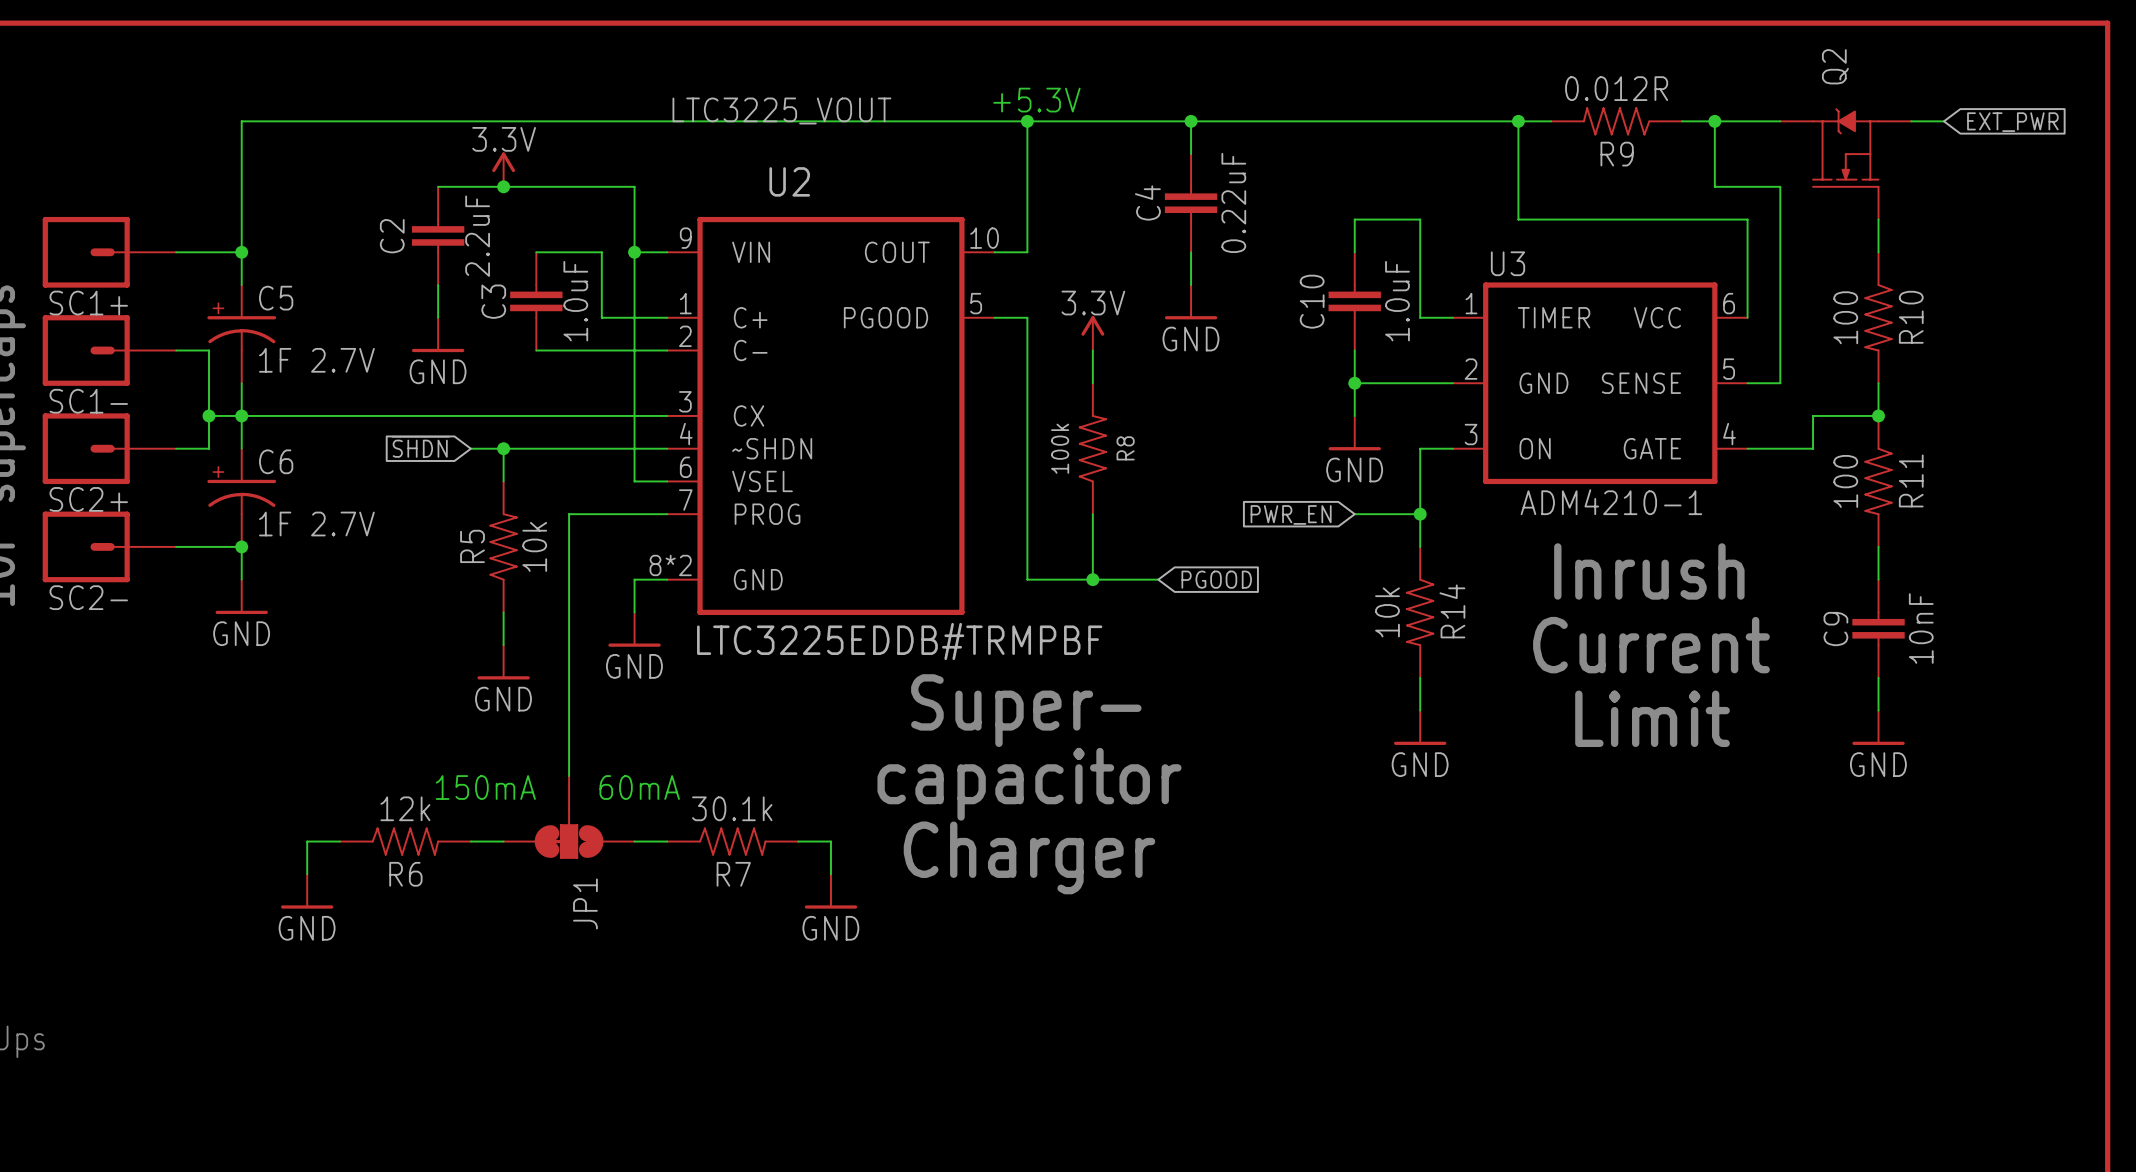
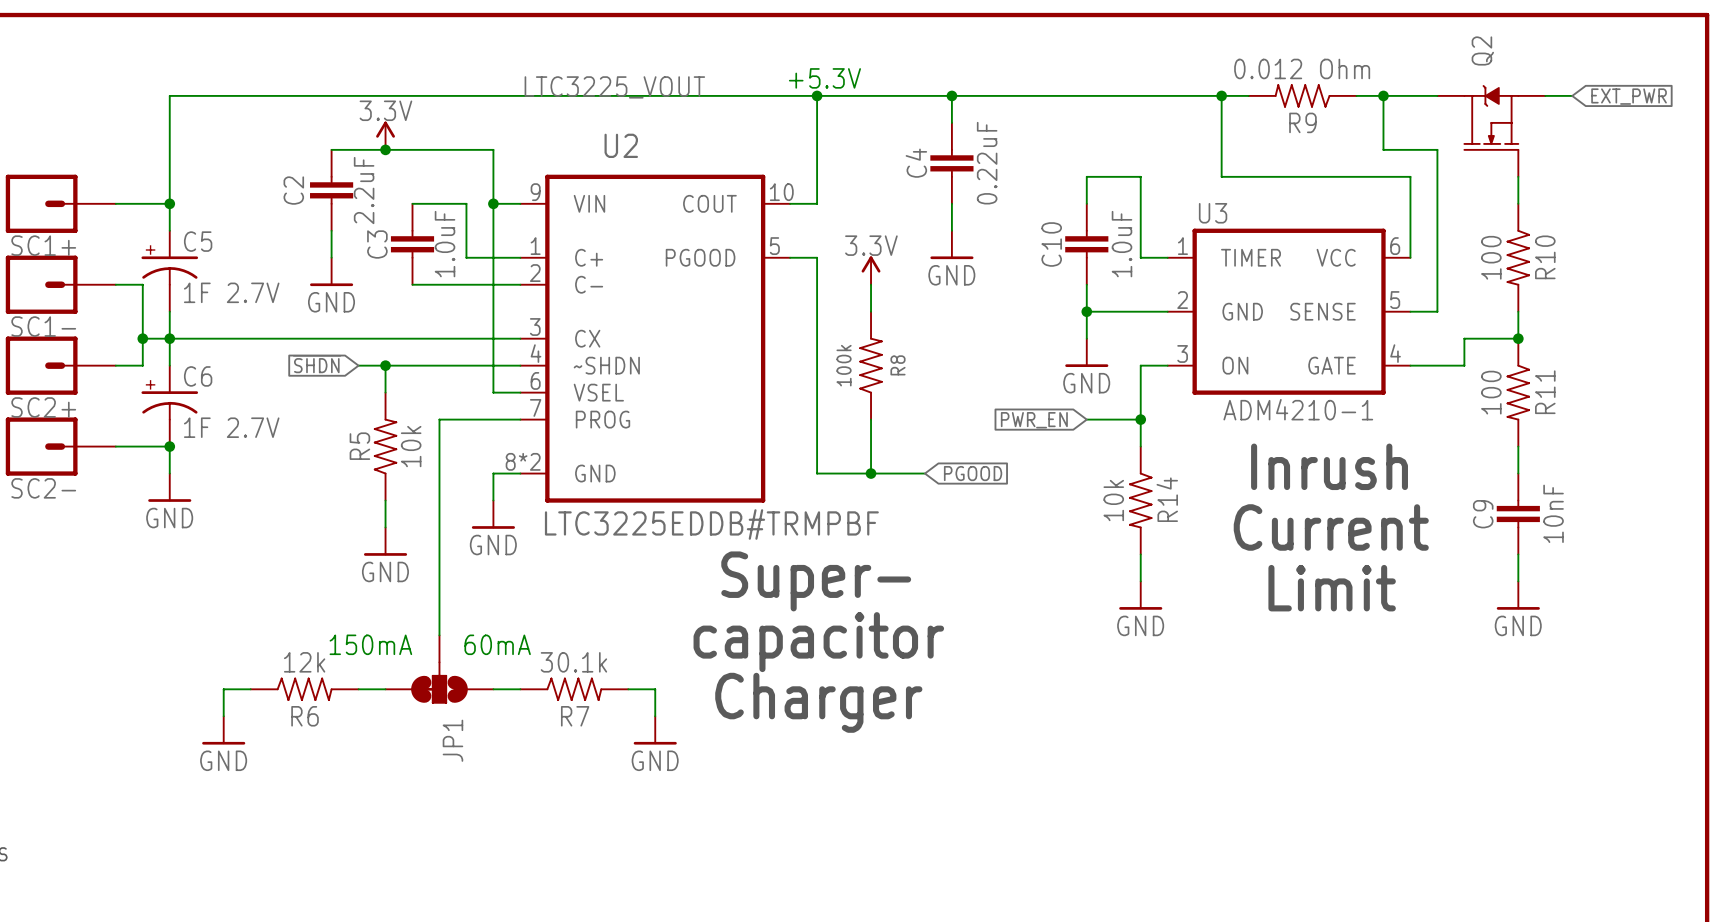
R9 value: 0.012R (1616, 88) -> 0.012 Ohm (1302, 68)

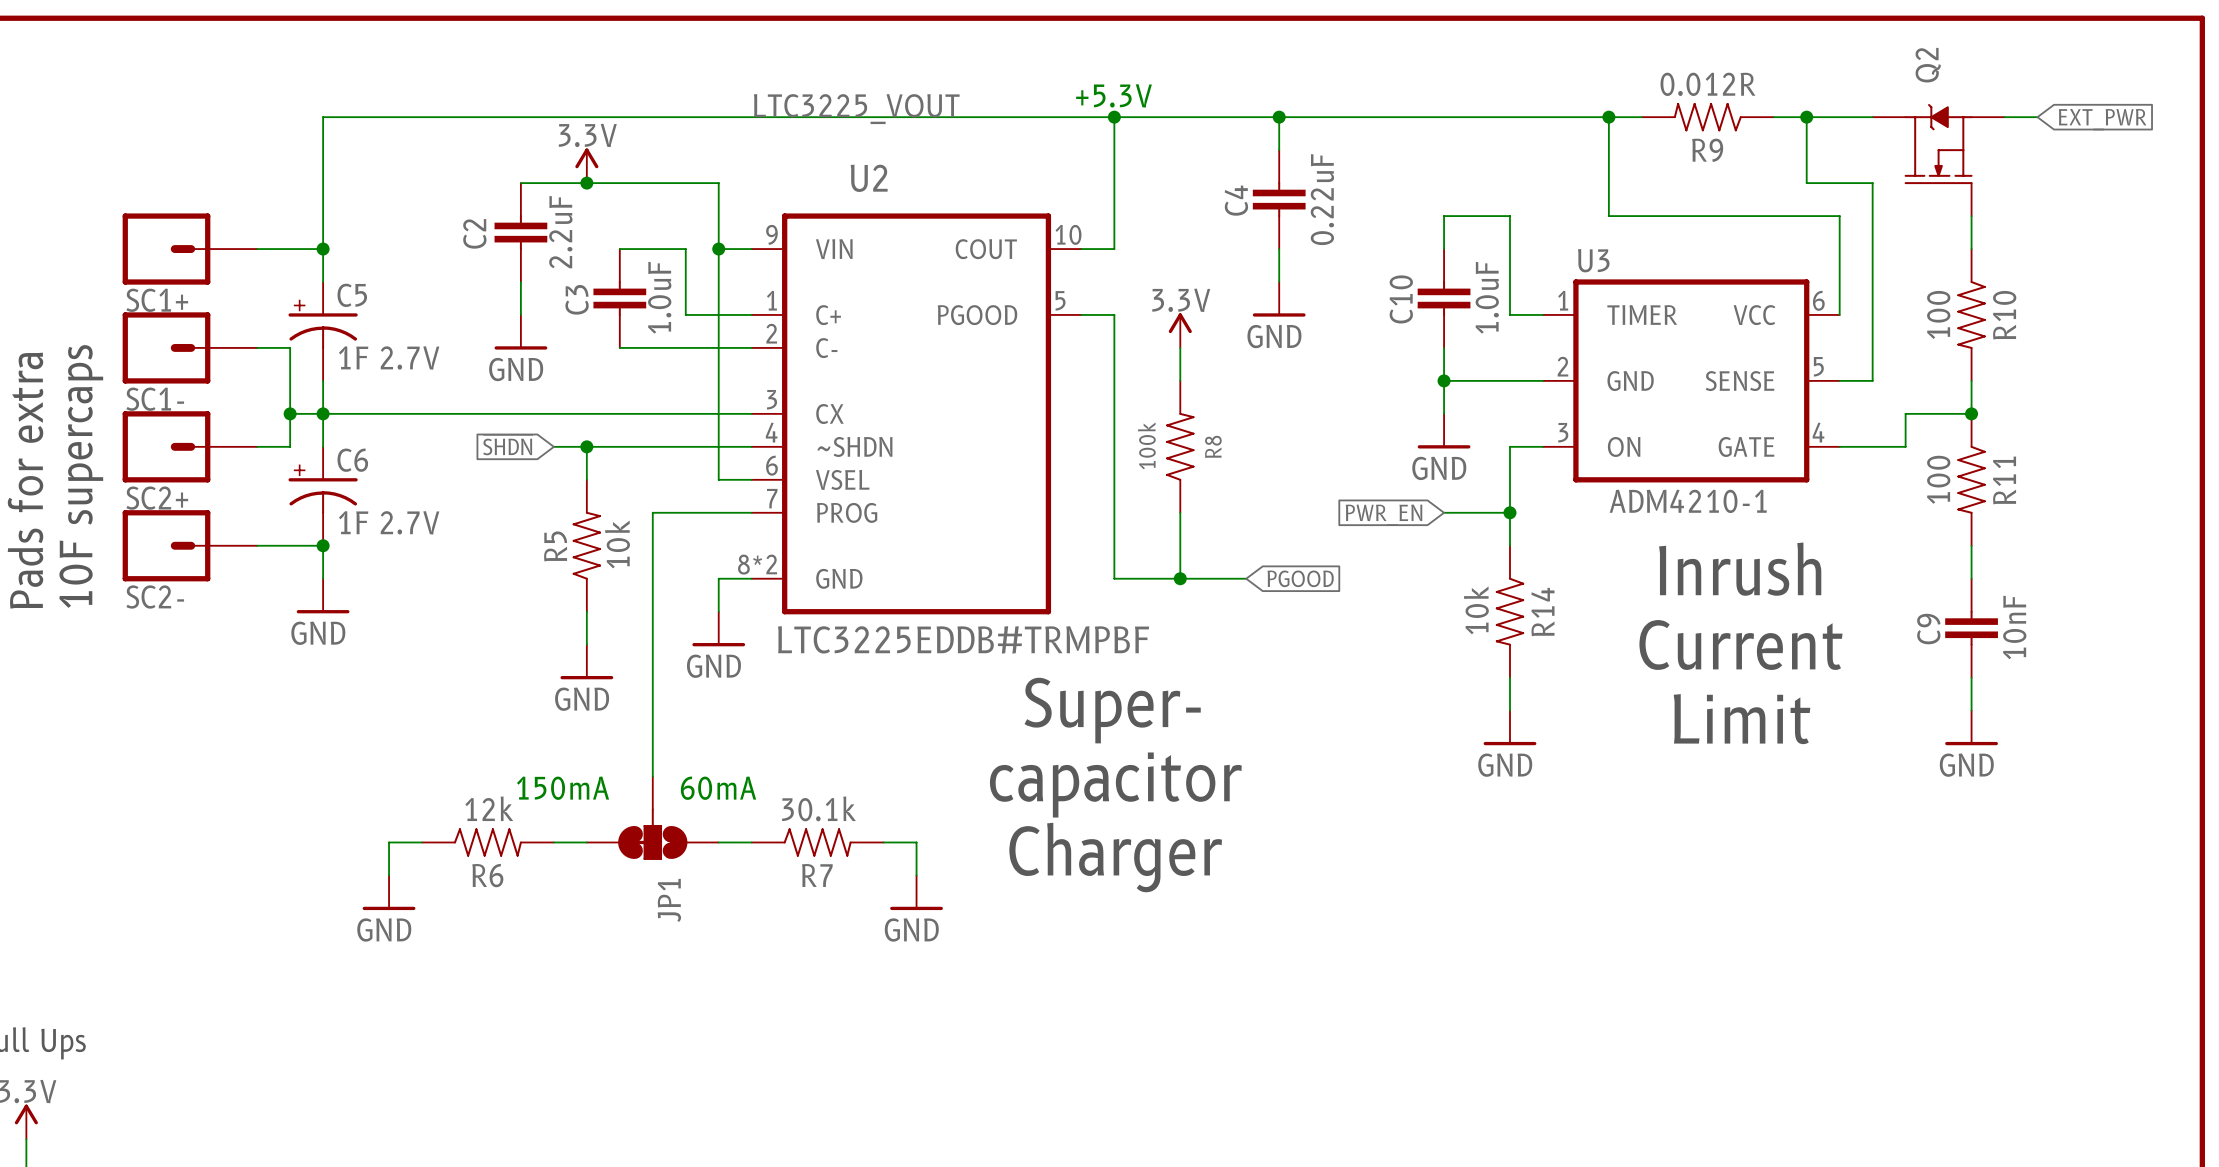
R9 value: 0.012 Ohm (1302, 68) -> 0.012R (1707, 84)

